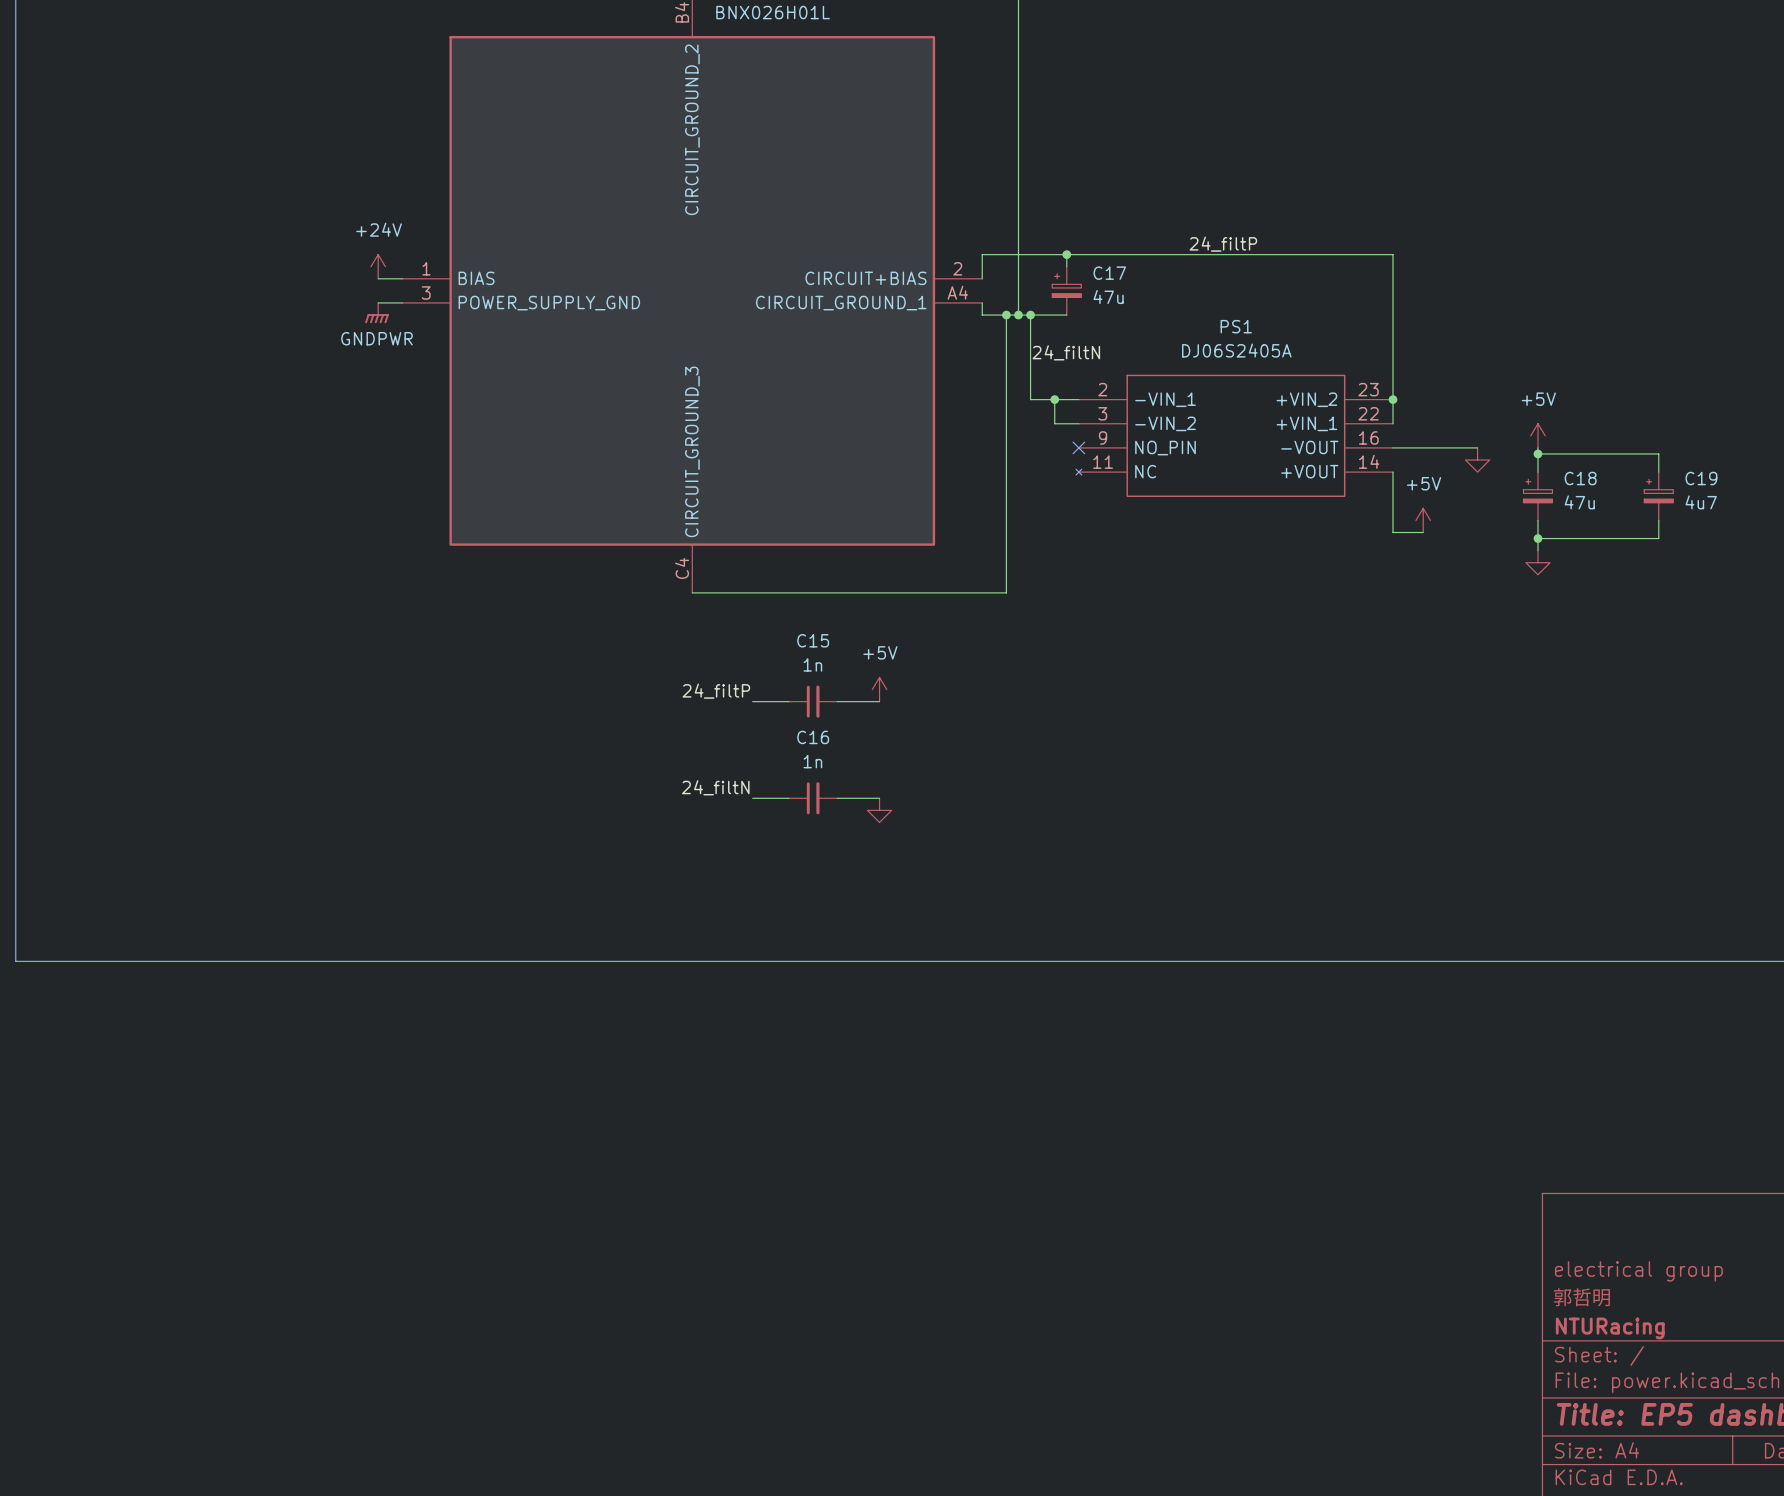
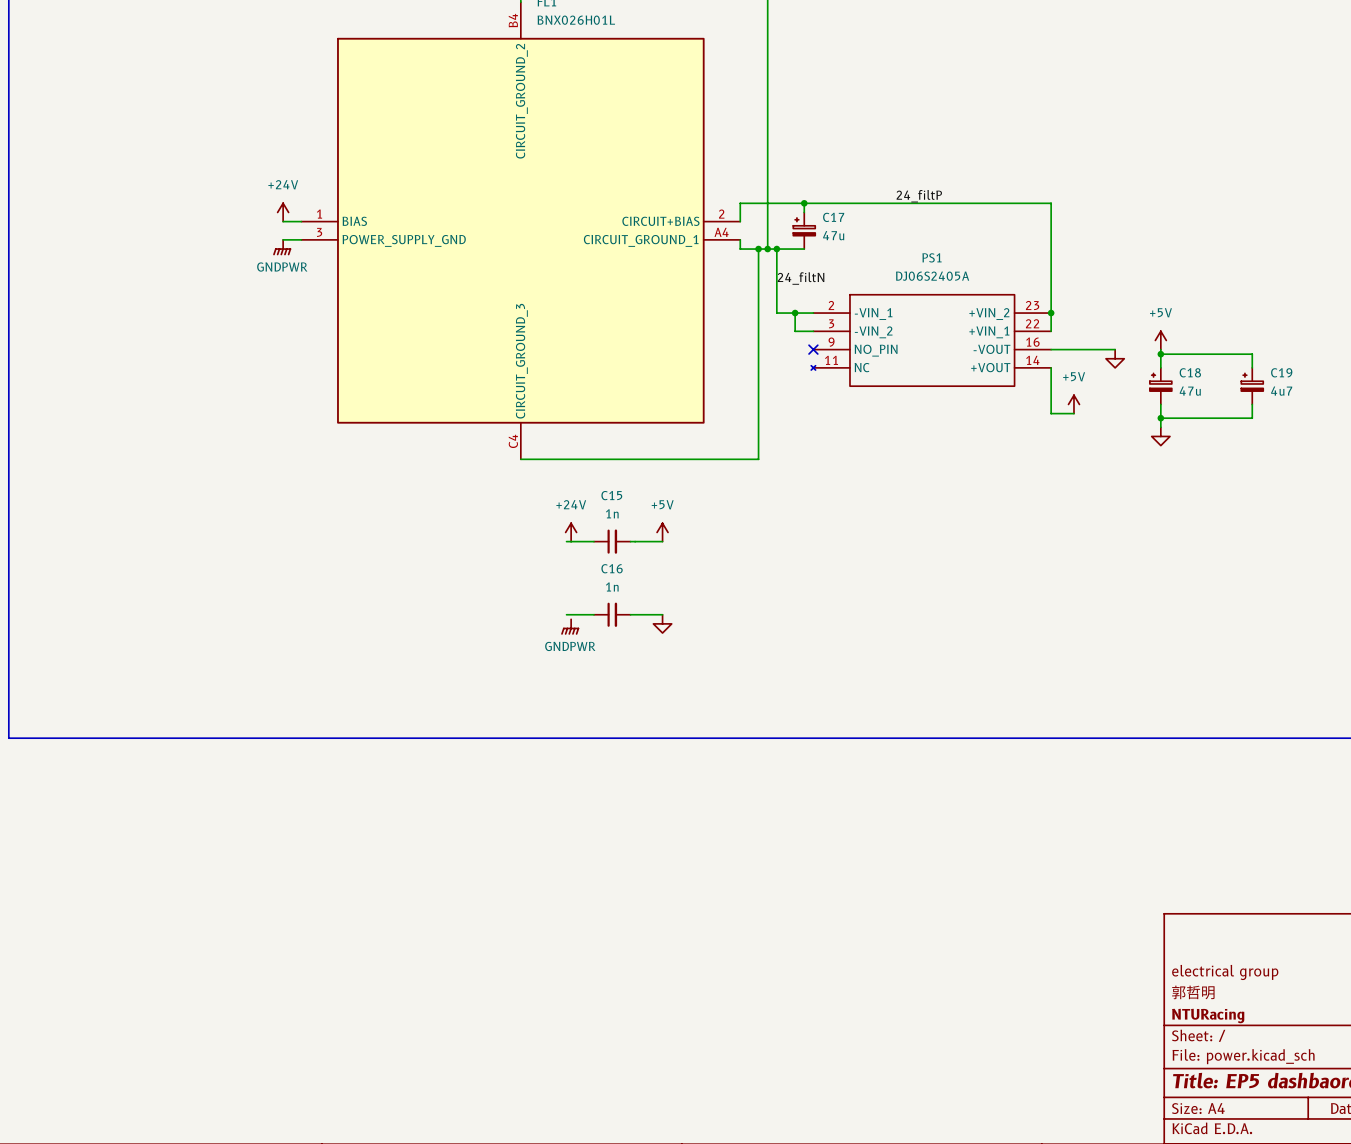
power symbol: none -> +24V (571, 532)
label: 24_filtP (716, 691) -> none
label: 24_filtN (715, 787) -> none
power symbol: none -> GNDPWR (570, 627)

